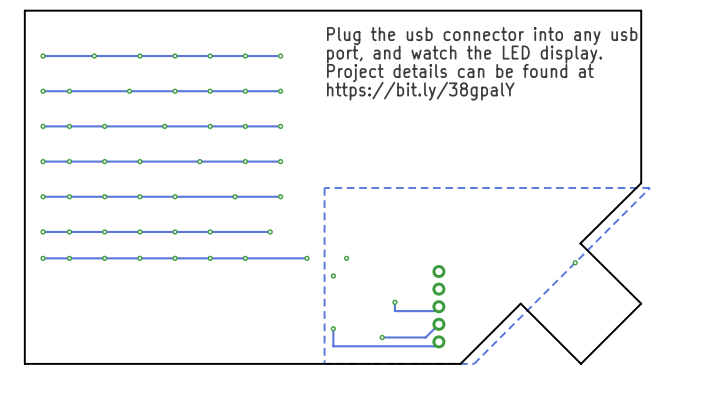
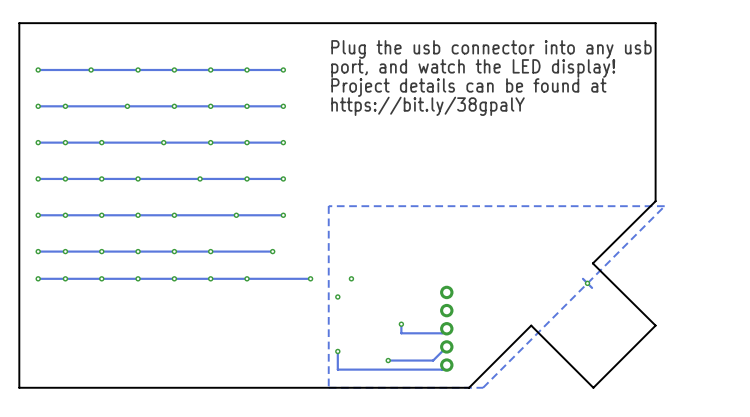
text: port, and watch the LED display. (464, 54) -> port, and watch the LED display! (473, 68)
track: none -> (582, 278) (592, 287)

